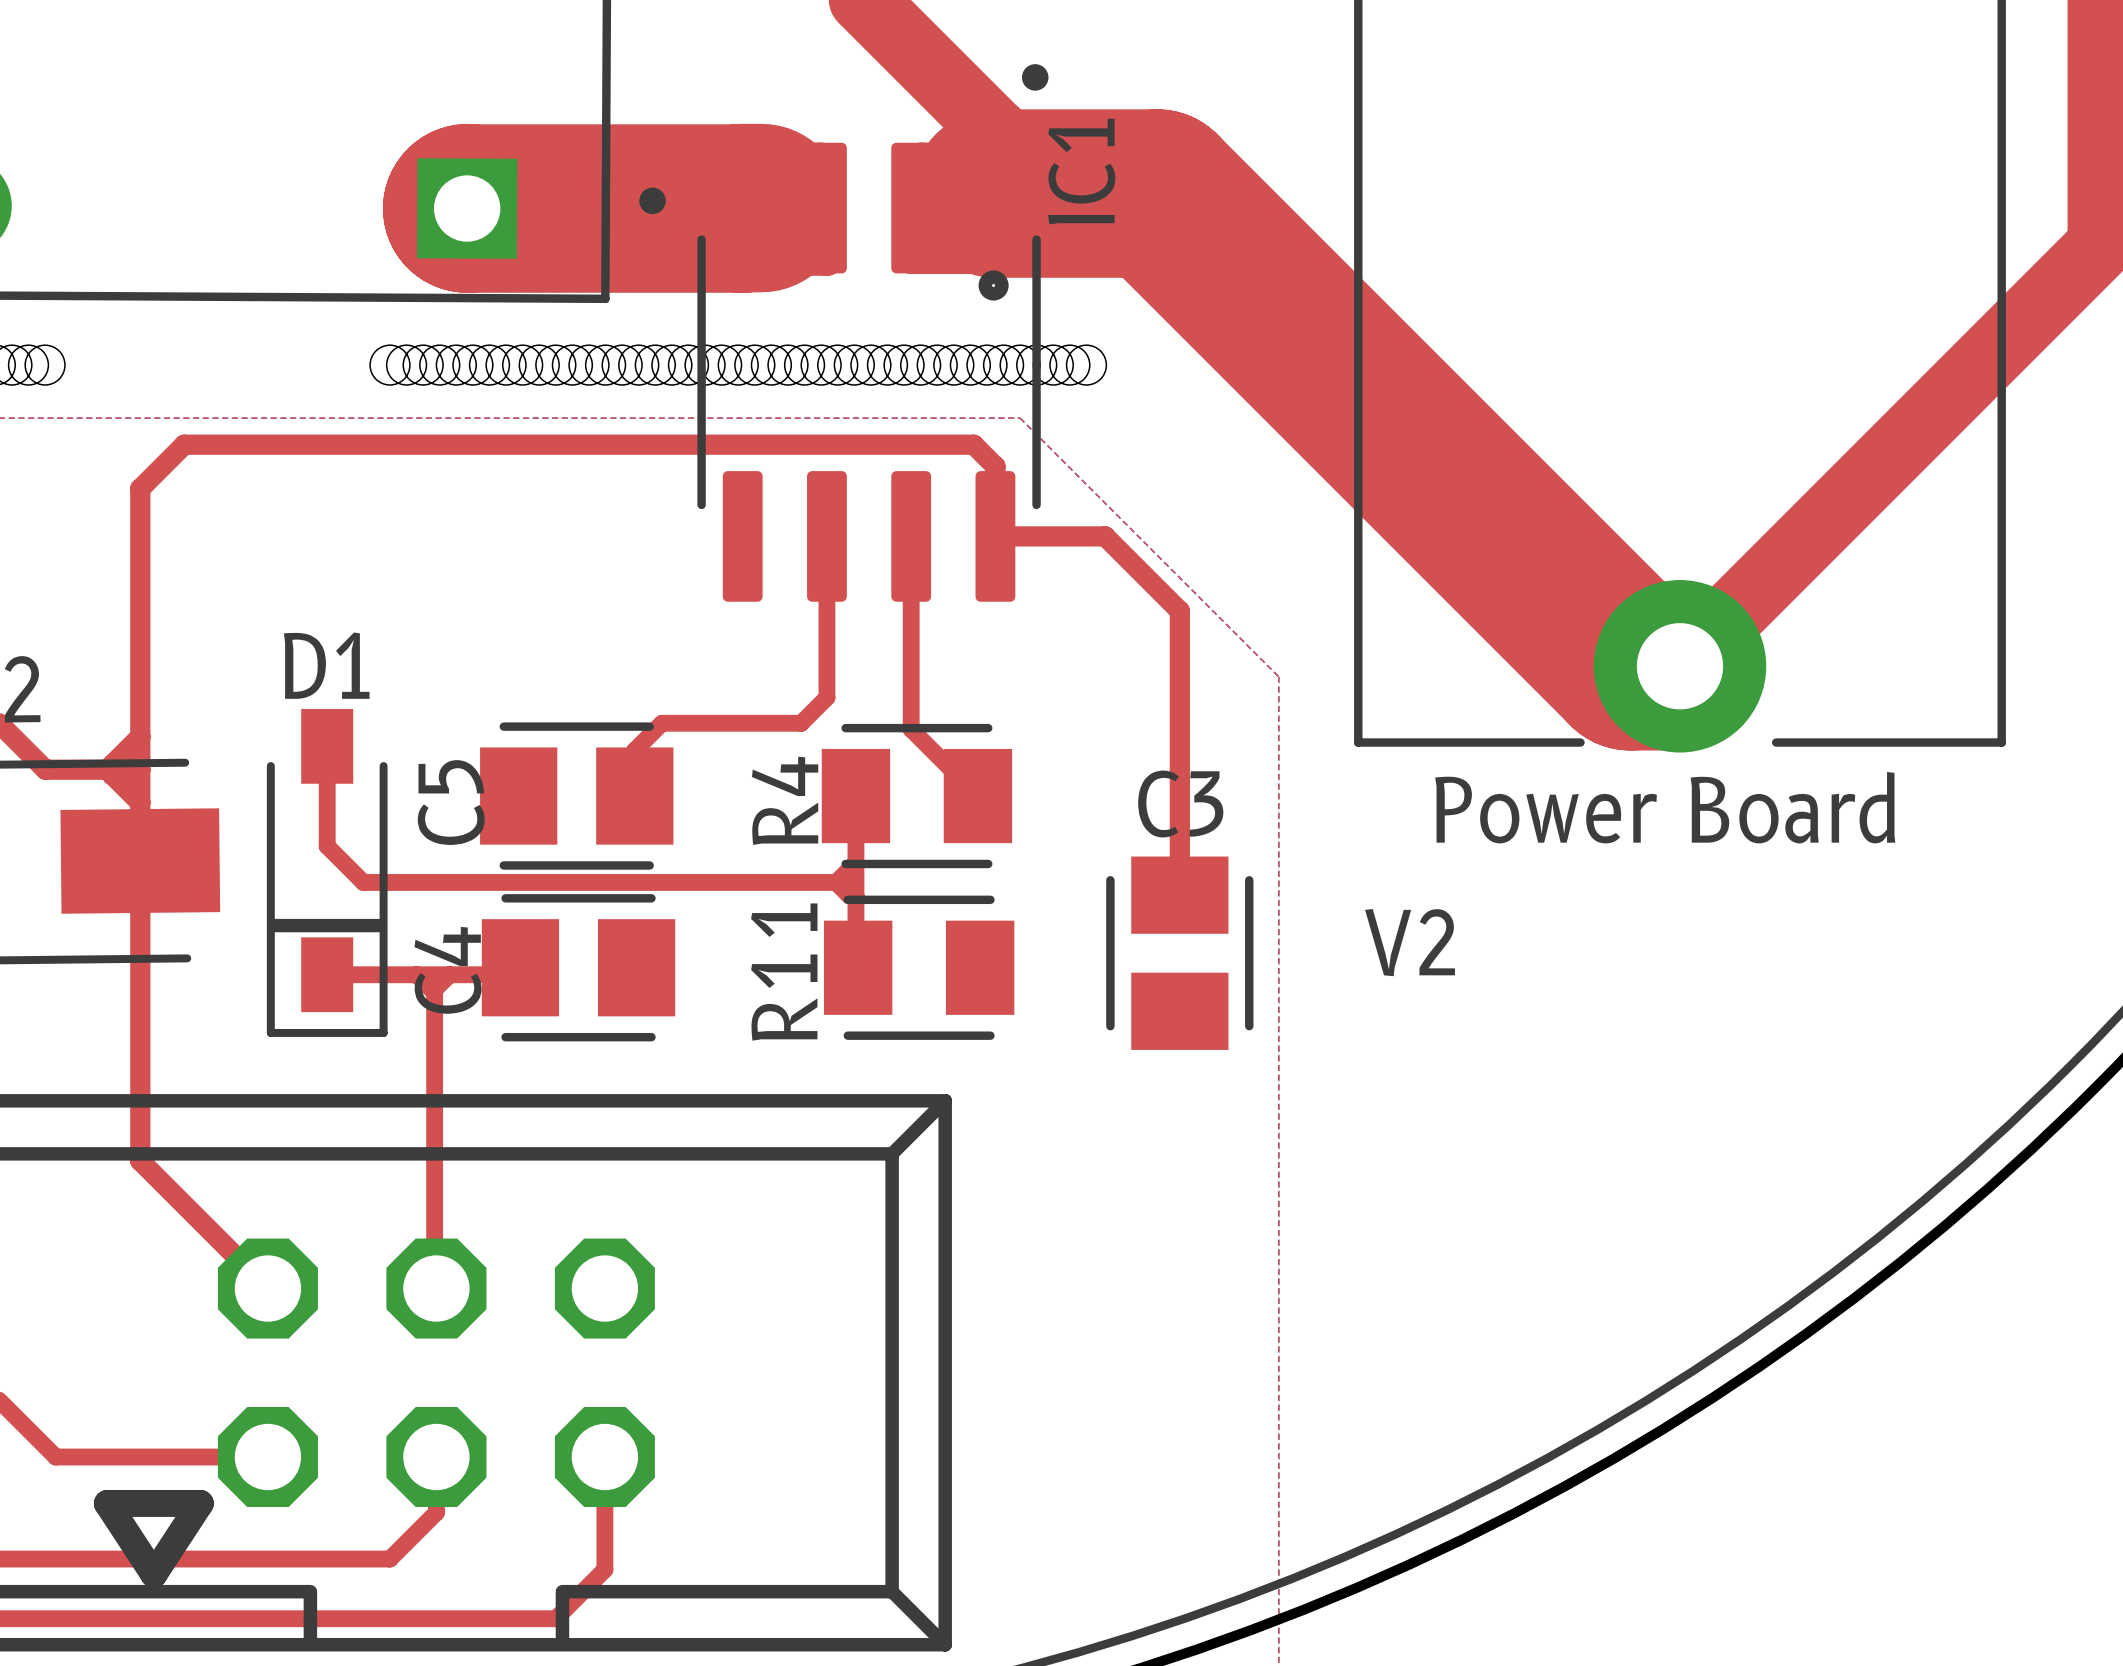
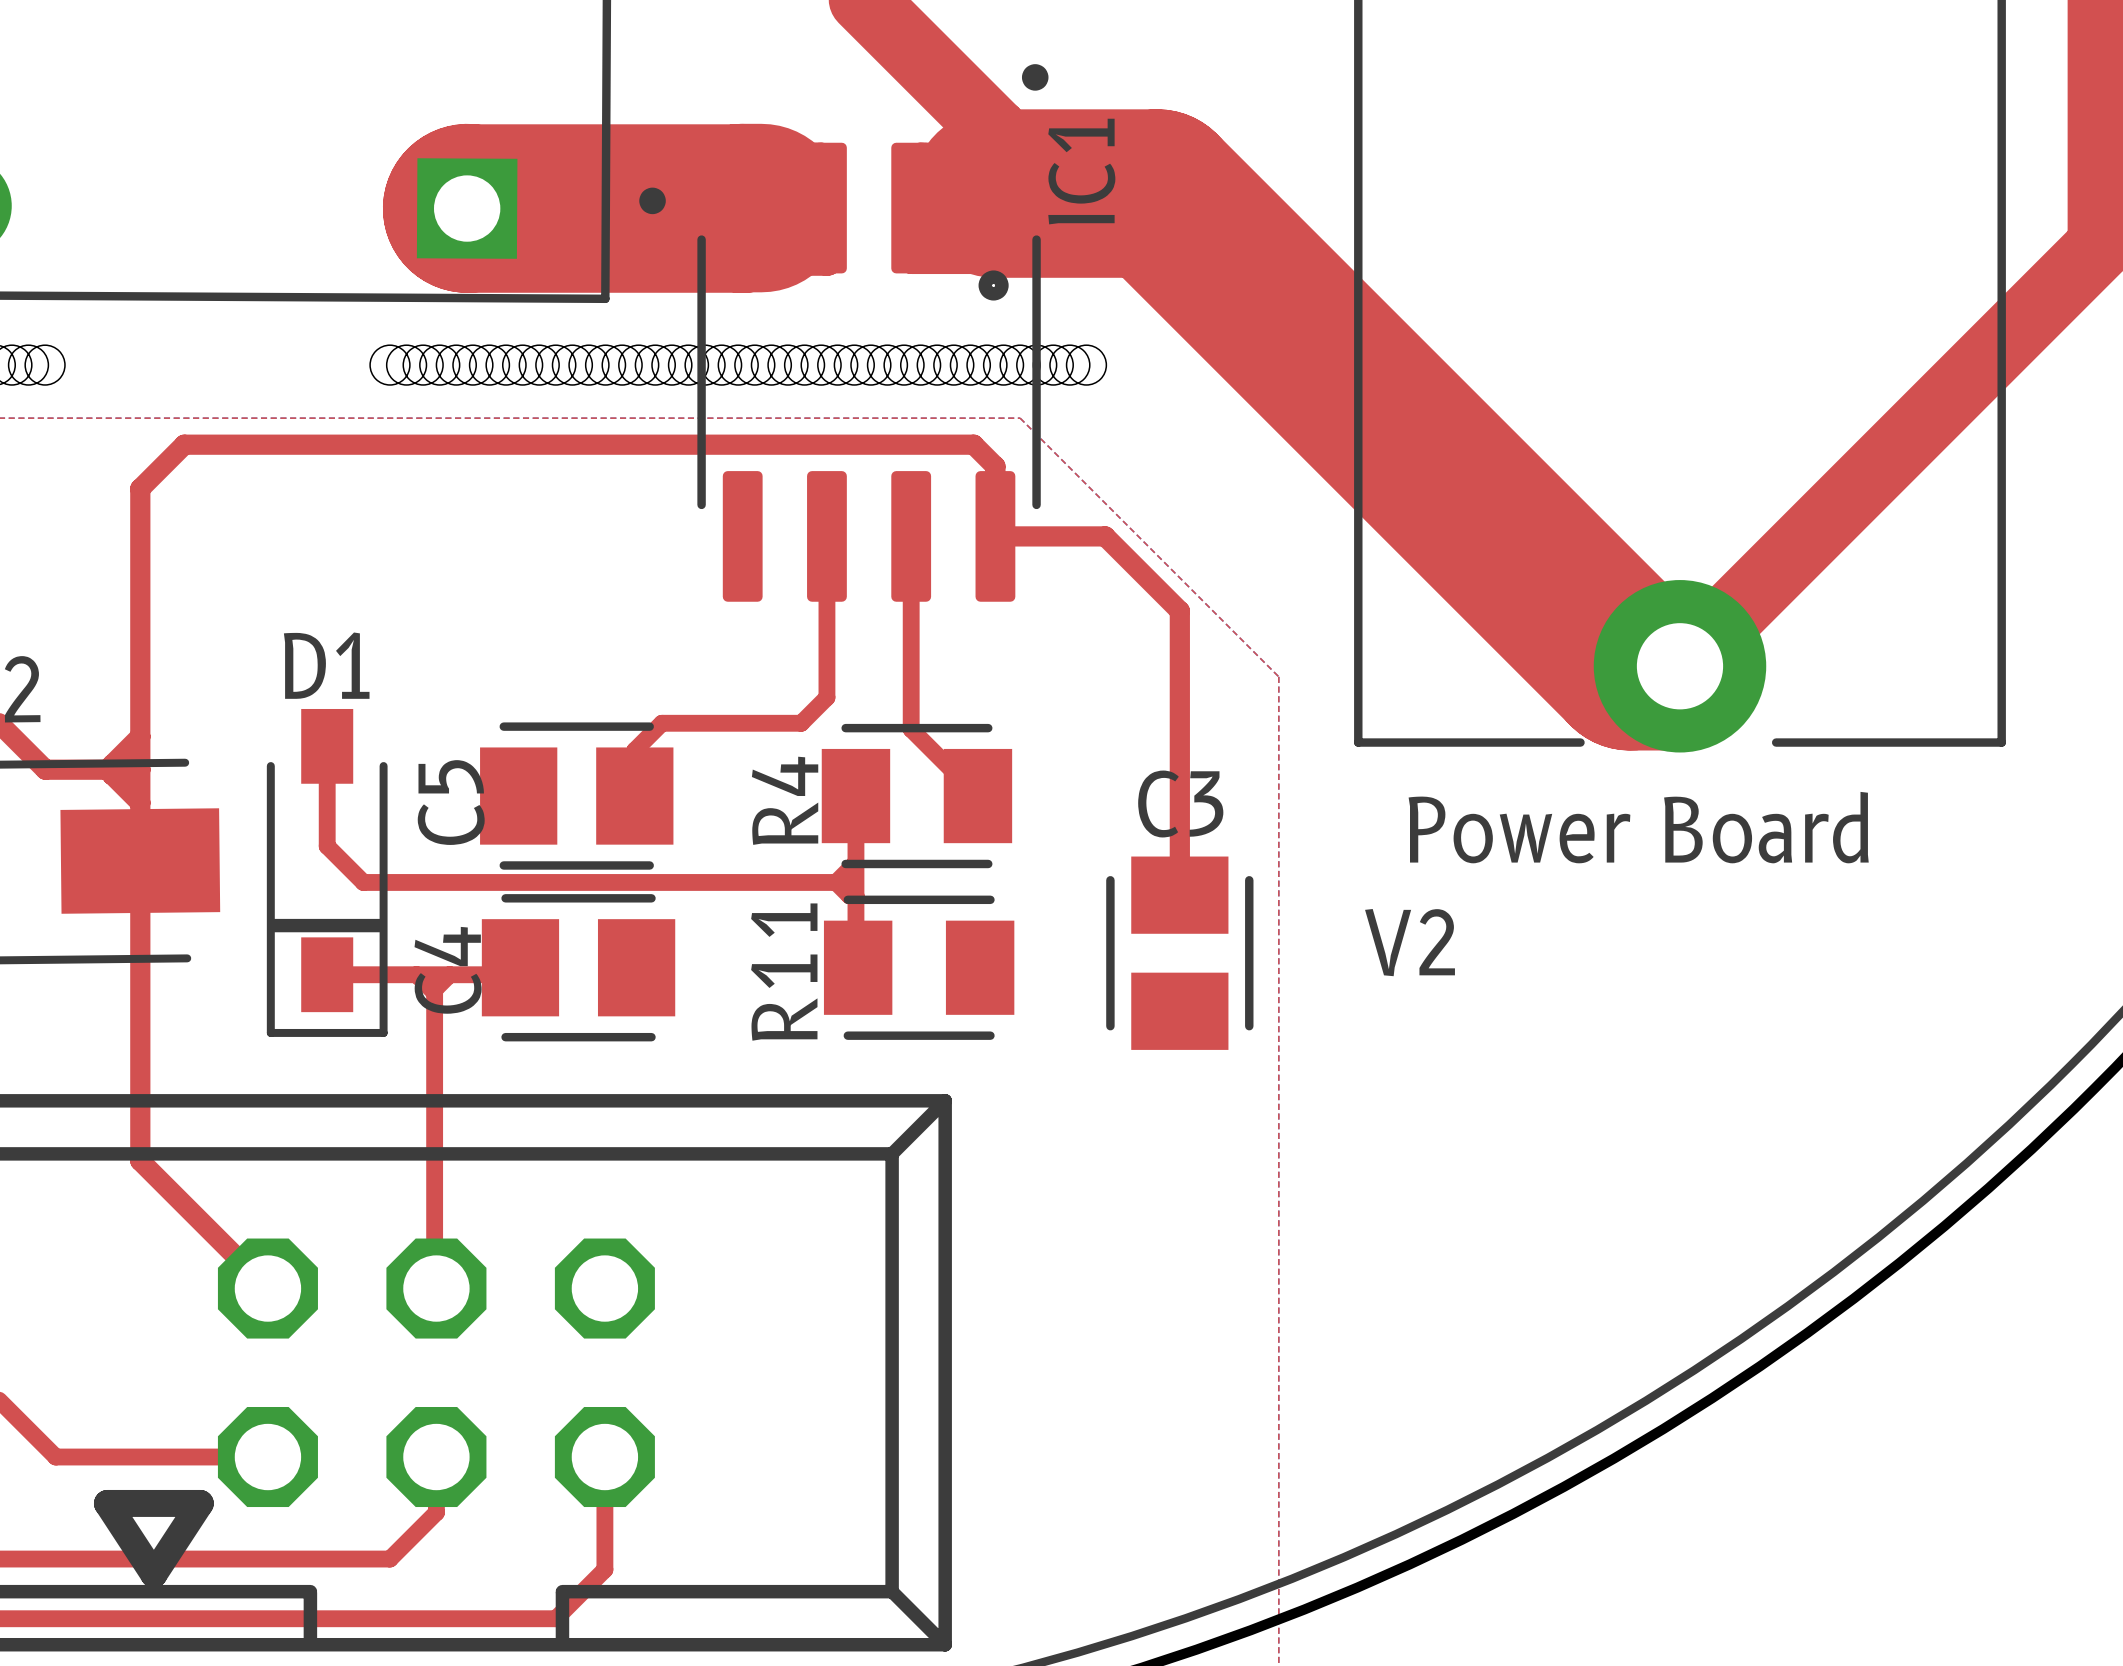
text position: Power Board (1665, 807) -> Power Board (1638, 827)

